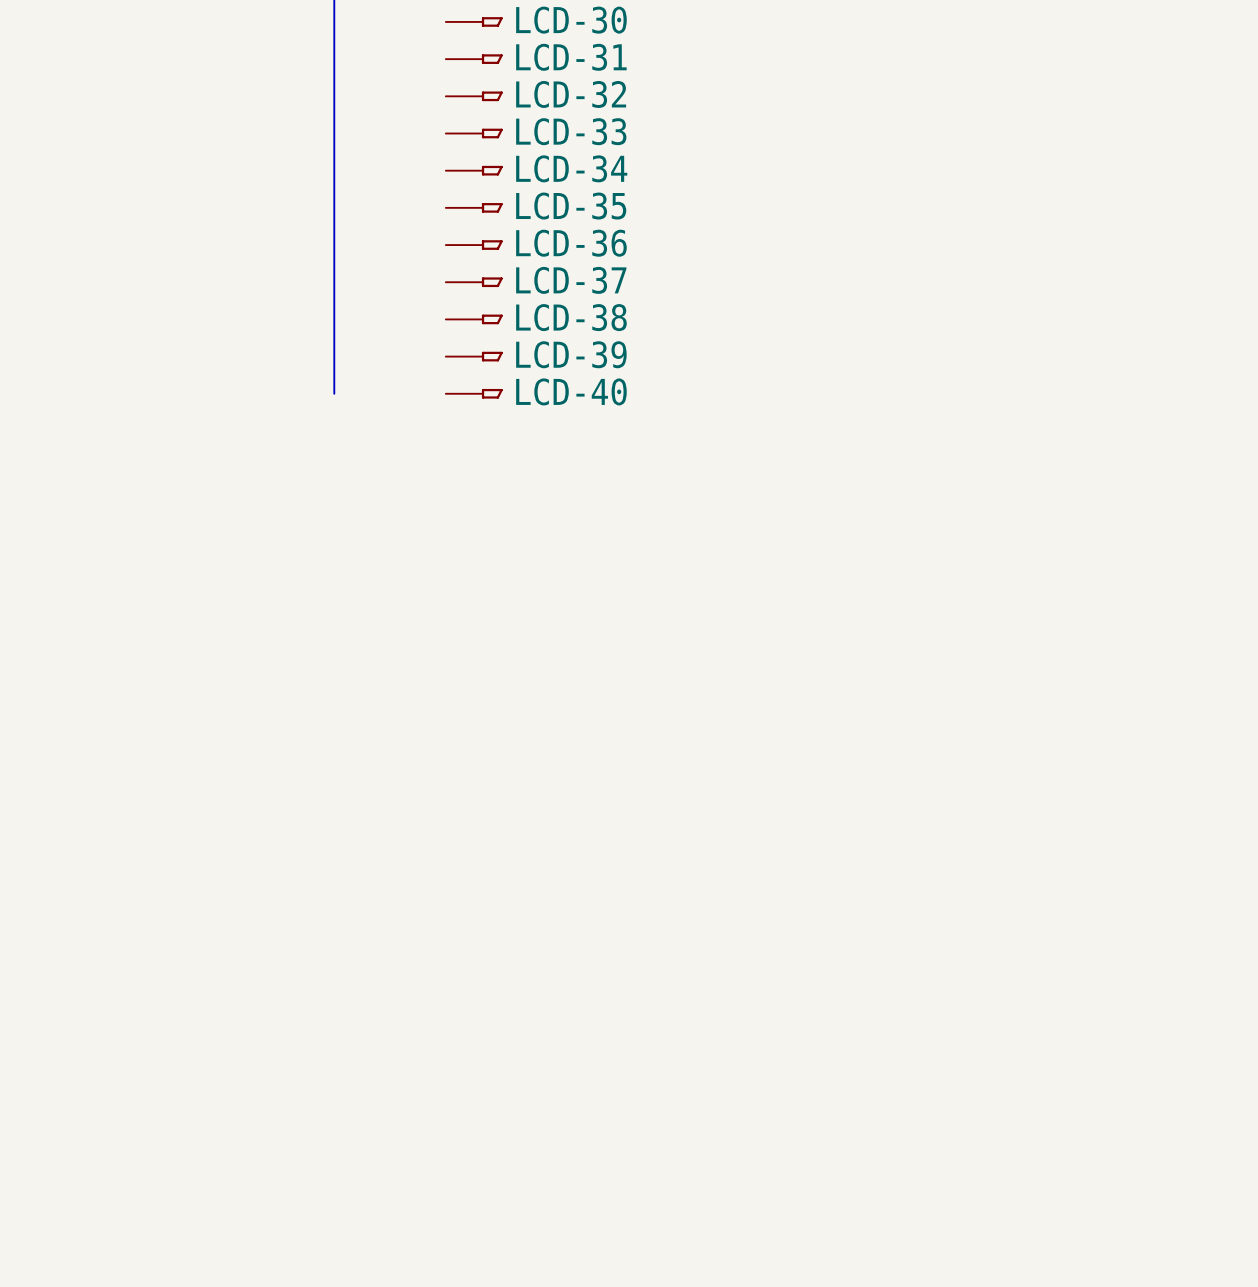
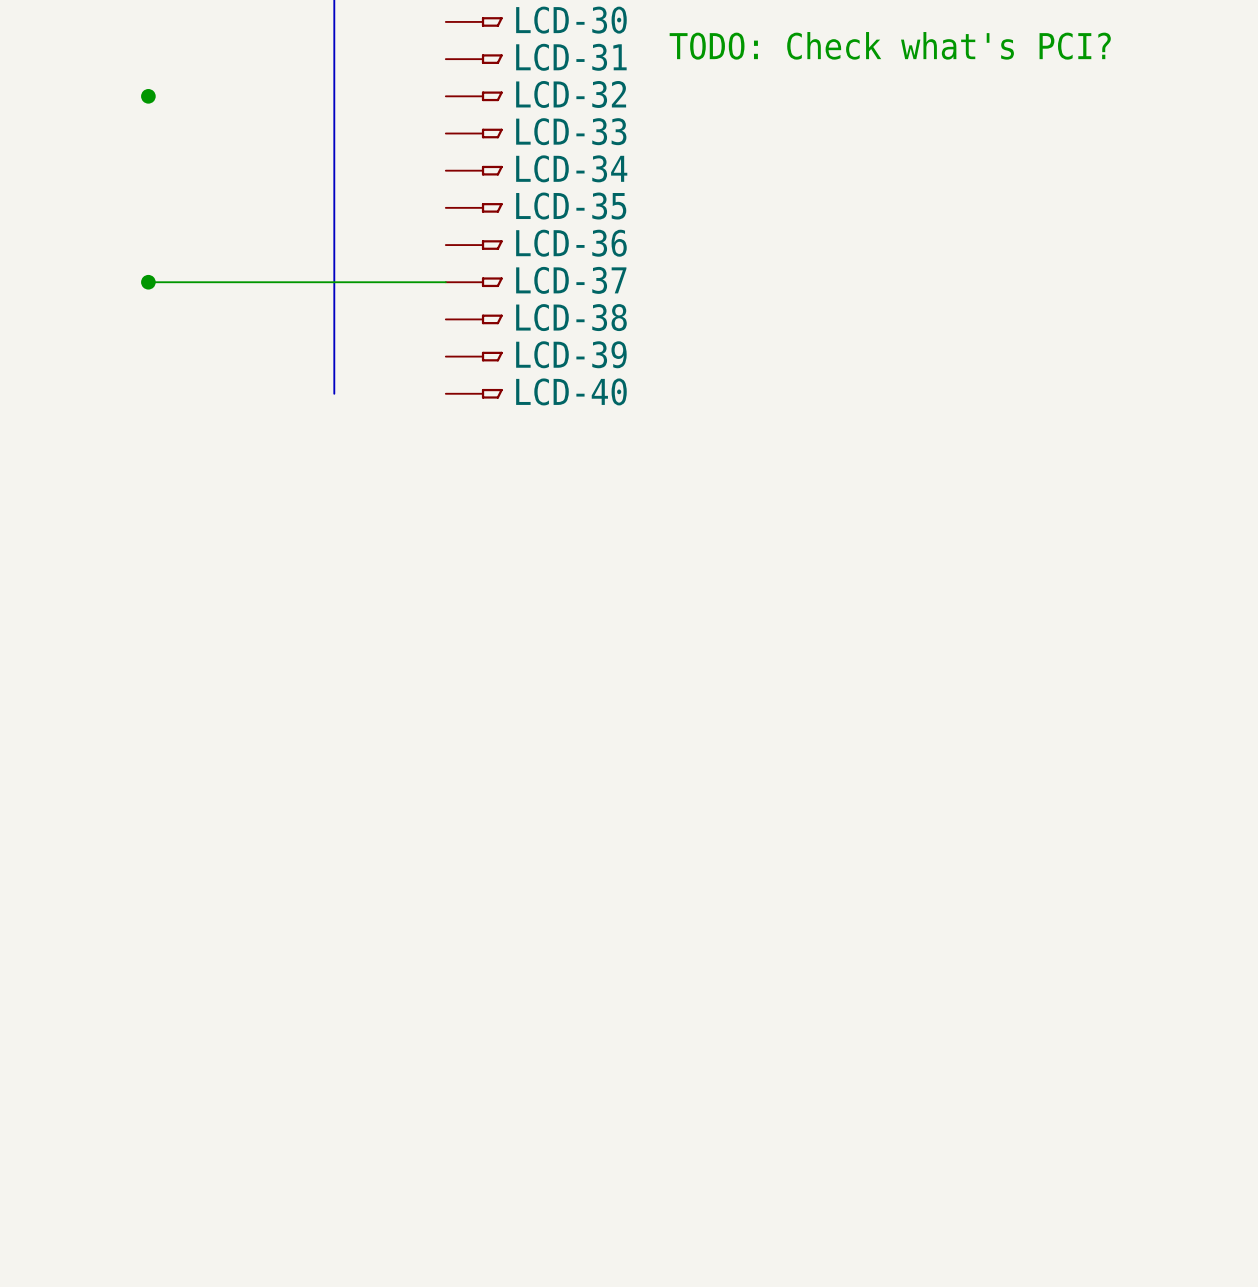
text: none -> TODO: Check what's PCI? (890, 45)
junction: none -> (148, 96)
wire: none -> (148, 282) (445, 282)
junction: none -> (148, 282)

